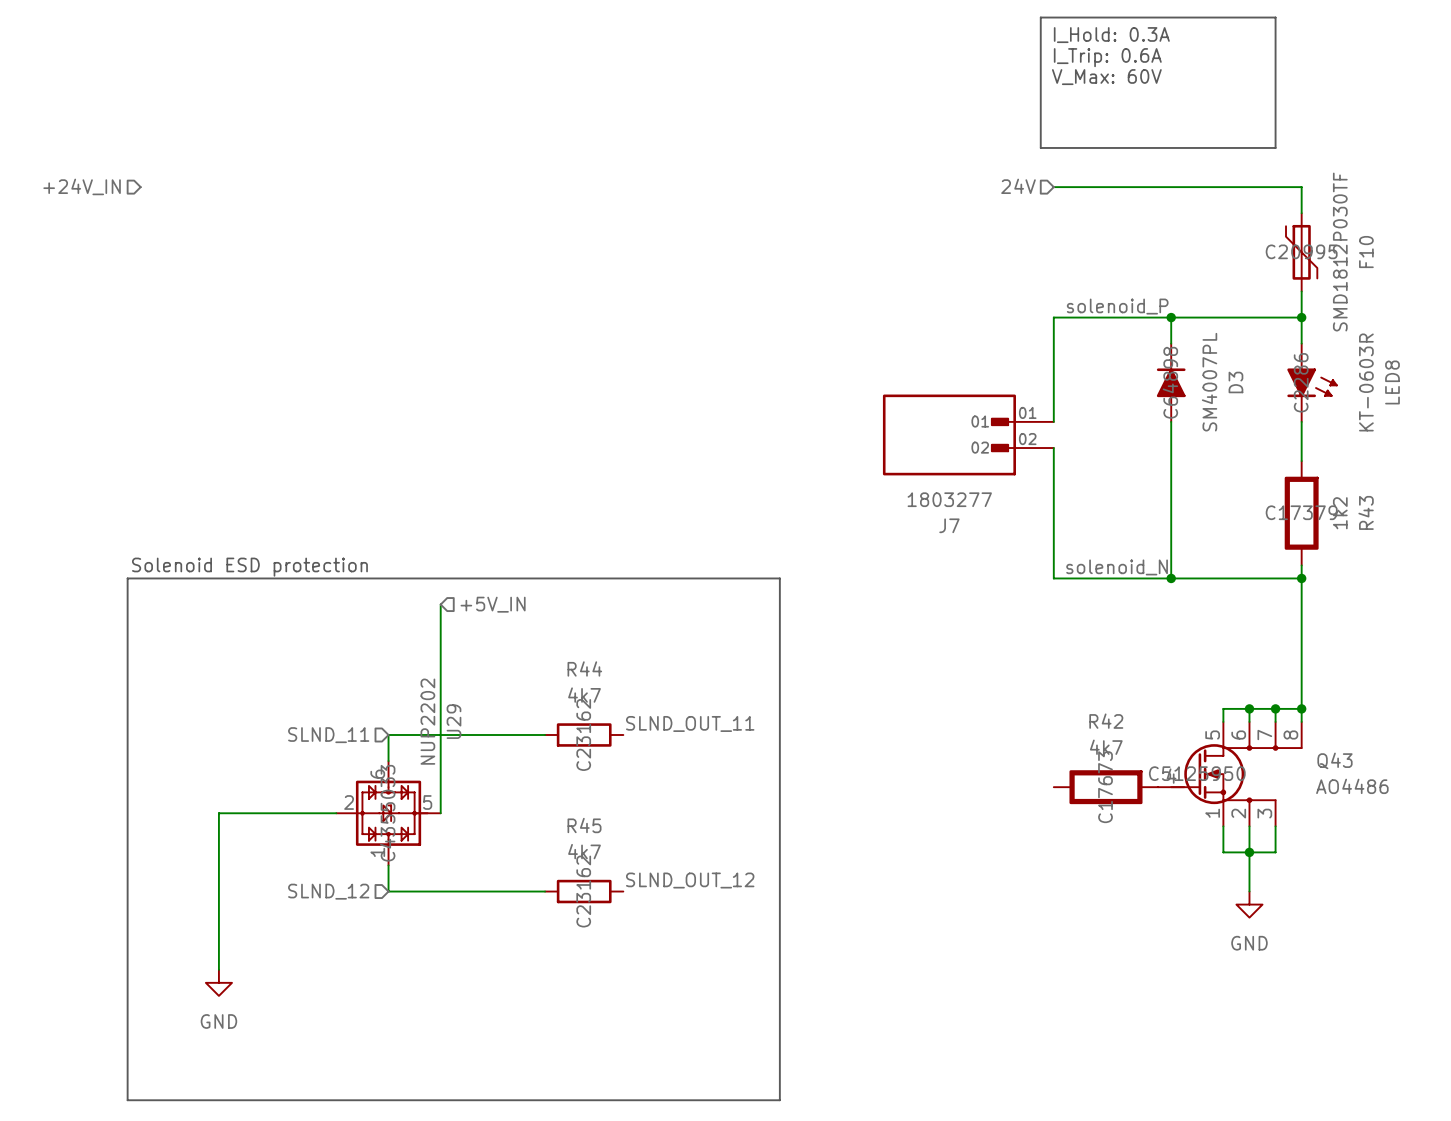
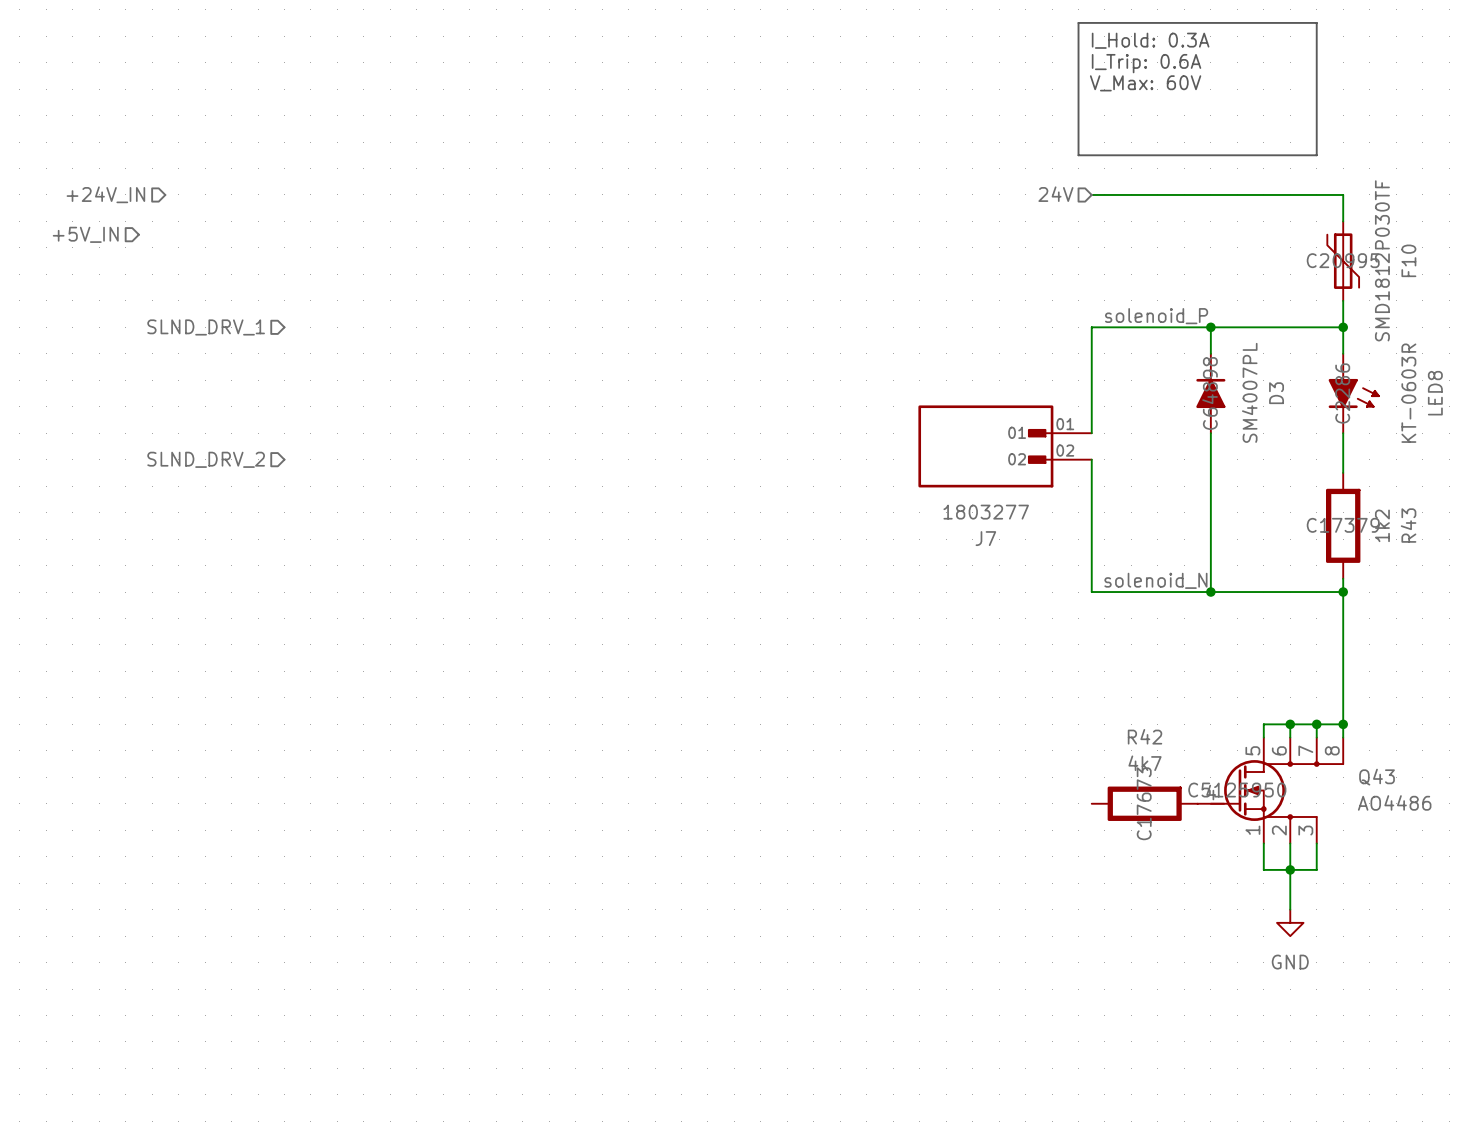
hierarchical label: none -> +5V_IN (85, 234)
hierarchical label: none -> SLND_DRV_1 (206, 327)
hierarchical label: none -> SLND_DRV_2 (206, 459)
text: Solenoid ESD protection (249, 567) -> none
line: (127, 578) (779, 578) (779, 1100) (127, 1100) (127, 578) -> none
wire: (440, 604) (440, 813) -> none
hierarchical label: +5V_IN (493, 604) -> none
label: SLND_OUT_11 (690, 723) -> none
wire: (545, 734) (388, 734) (388, 761) -> none
R44: 4k7 (584, 734) -> none
hierarchical label: SLND_11 (328, 735) -> none
wire: (336, 813) (218, 813) (218, 969) -> none
U29: NUP2202 (388, 813) -> none
wire: (388, 865) (388, 891) (545, 891) -> none
label: SLND_OUT_12 (690, 880) -> none
hierarchical label: SLND_12 (328, 891) -> none
R45: 4k7 (584, 891) -> none
power symbol: GND (218, 982) -> none

